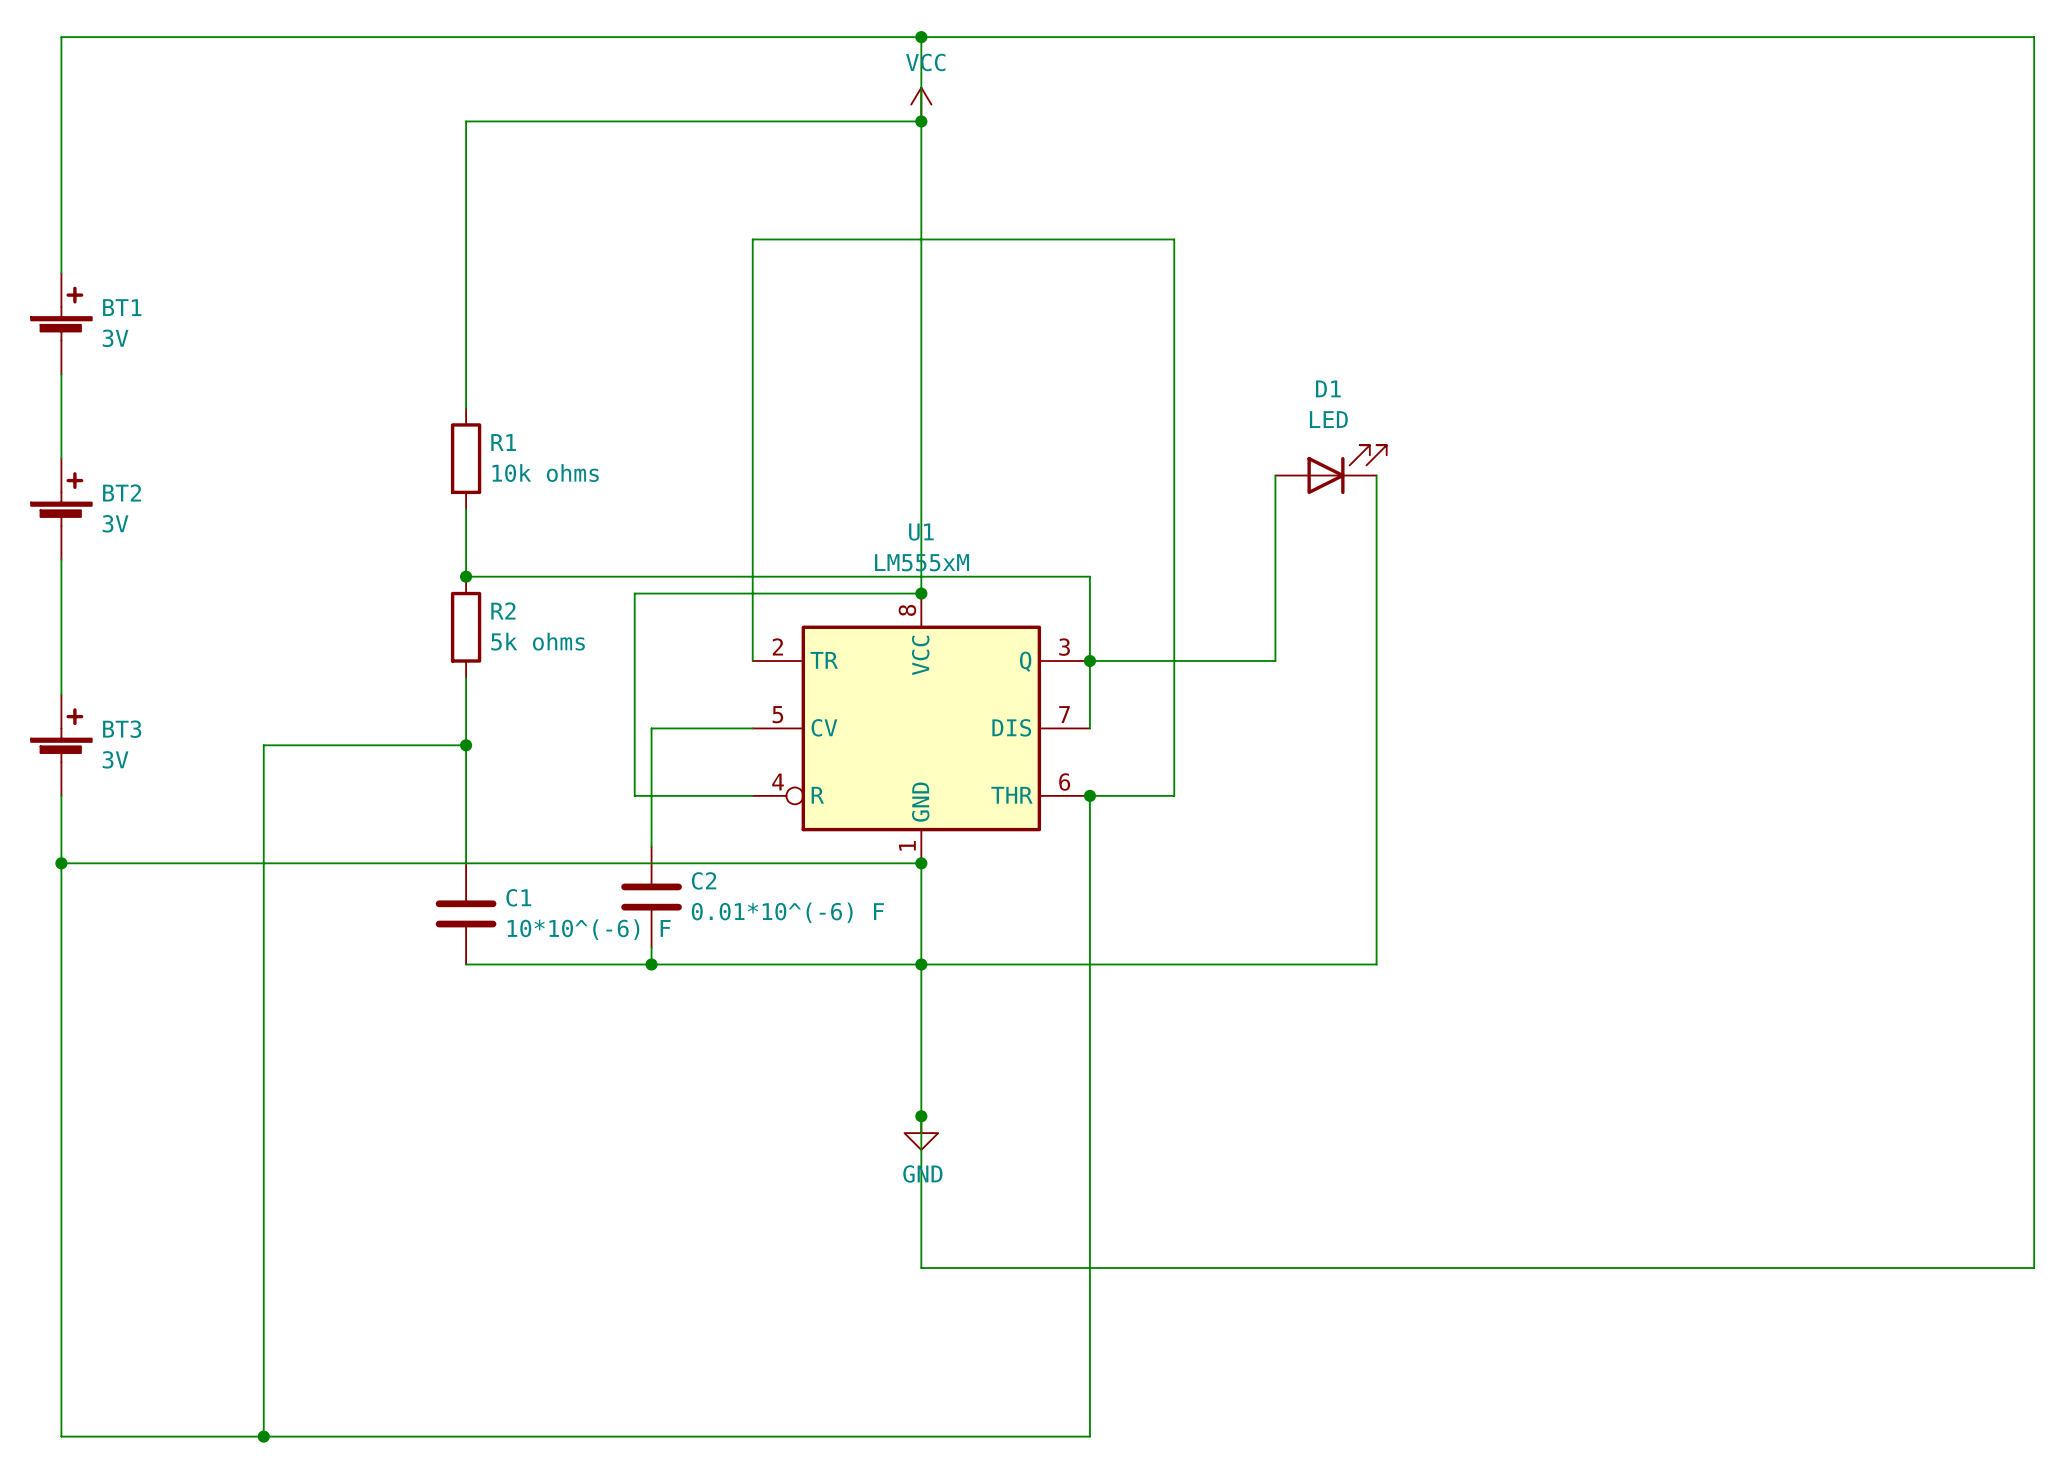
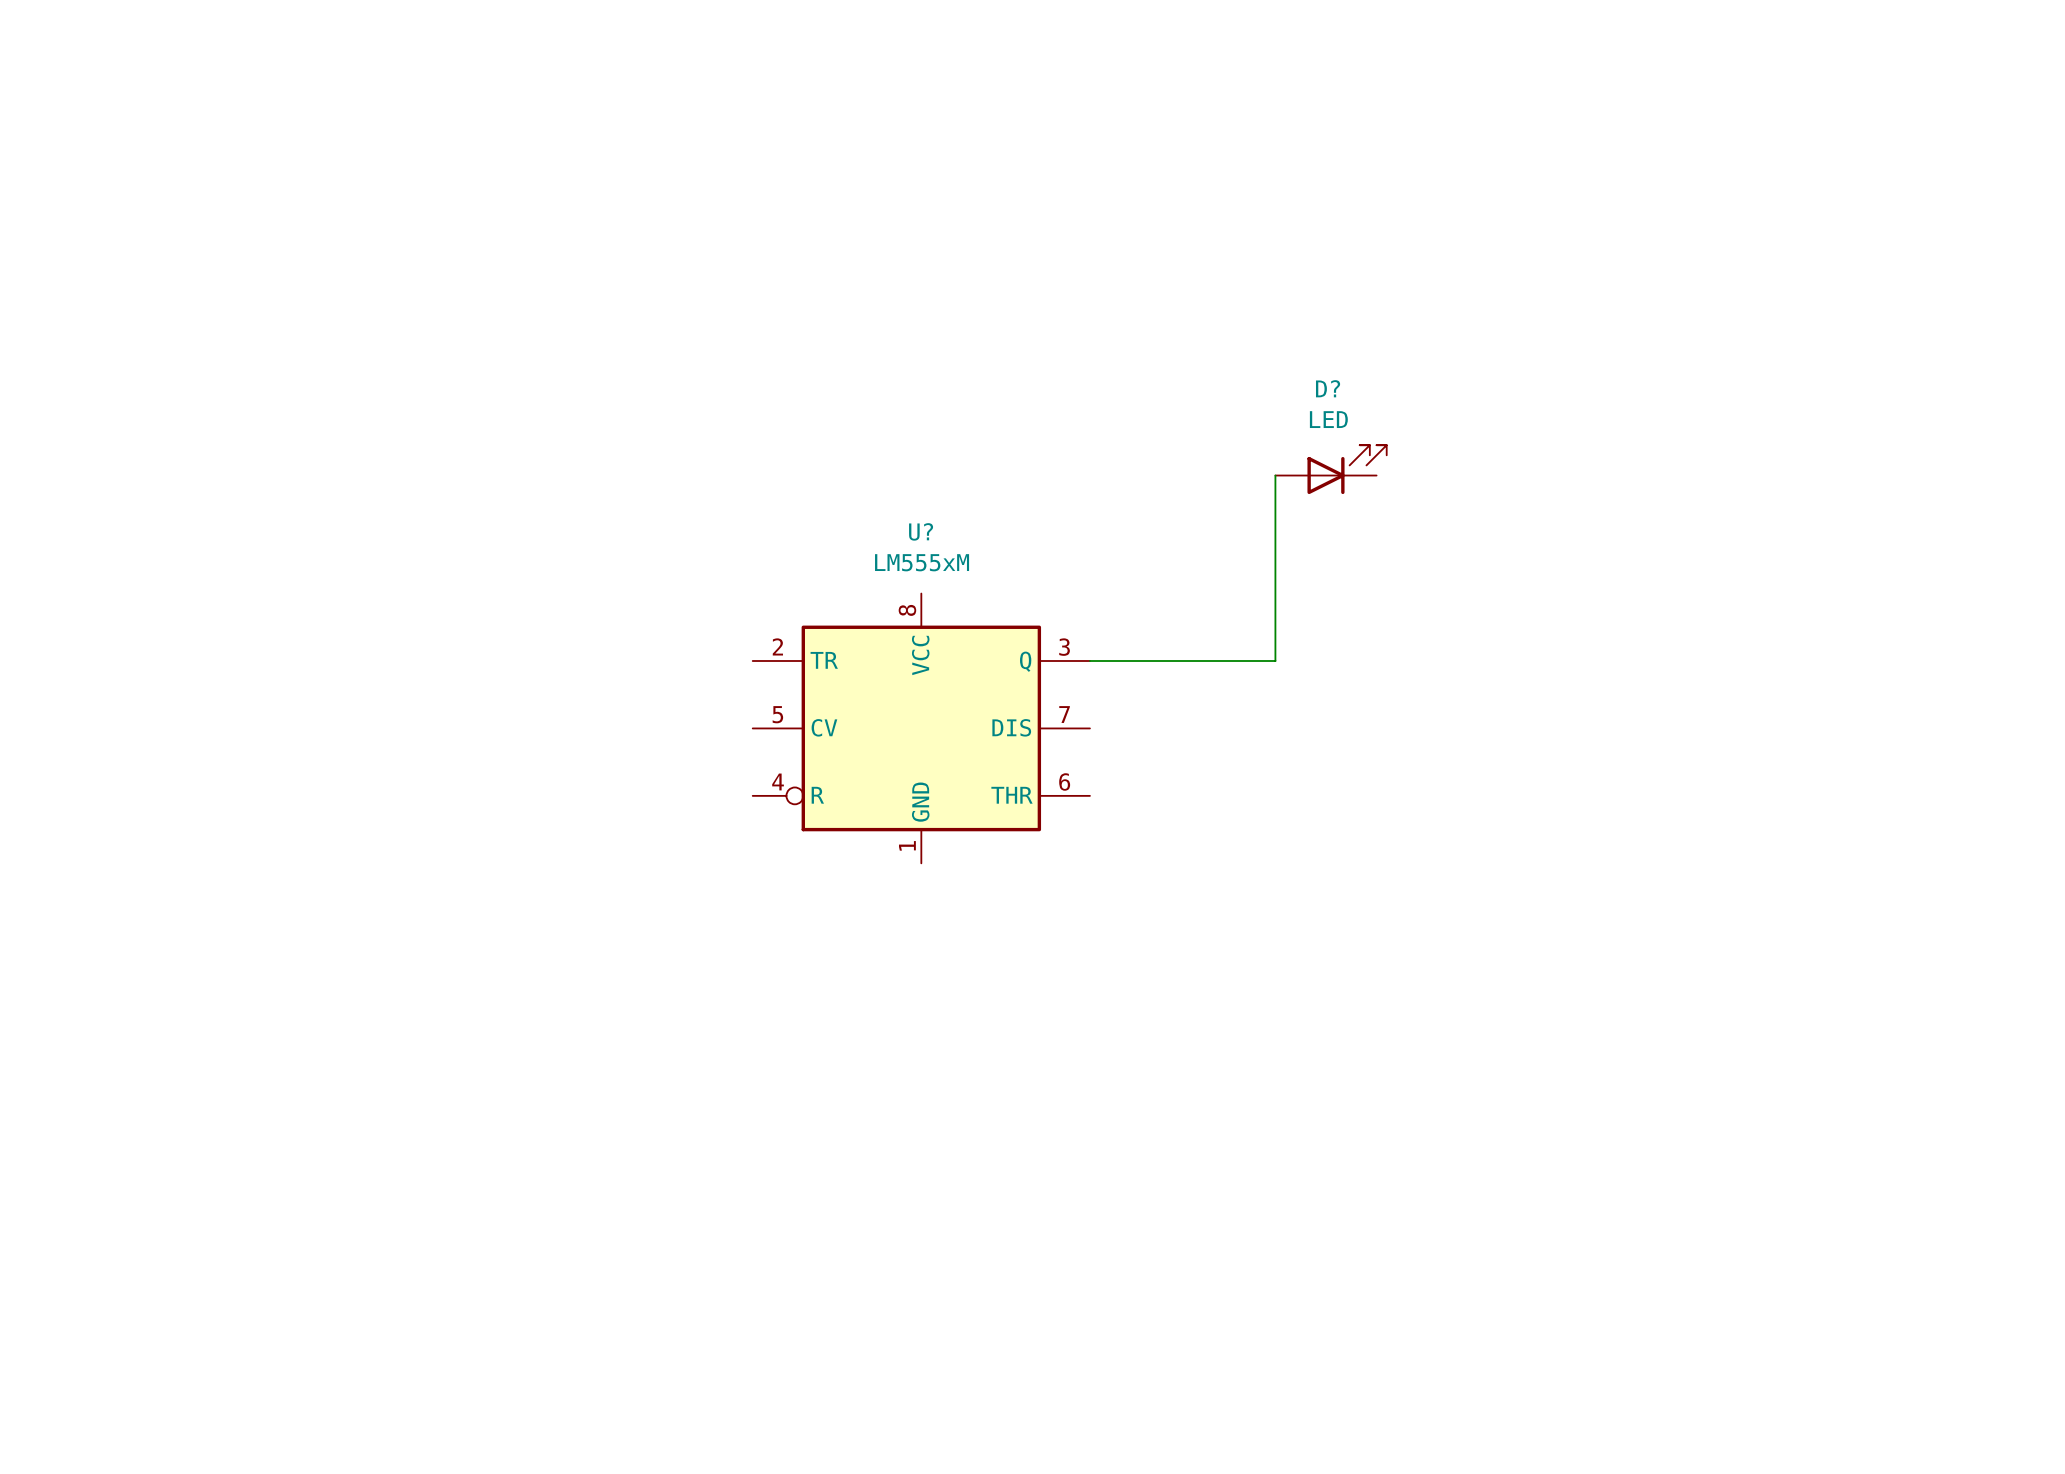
wire: (921, 37) (921, 593) (634, 593) (634, 795) (752, 795) -> none
junction: (921, 37) -> none
power symbol: VCC (921, 104) -> none
wire: (921, 121) (466, 121) (466, 408) -> none
junction: (921, 121) -> none
wire: (61, 273) (61, 37) (2034, 37) (2034, 1268) (921, 1268) (921, 863) (61, 863) -> none
BT1: 3V (61, 323) -> none
wire: (61, 374) (61, 458) -> none
D1 name: D1 (1328, 388) -> D? (1328, 388)
R1: 10k ohms (466, 458) -> none
wire: (1376, 475) (1376, 964) (466, 964) -> none
BT2: 3V (61, 509) -> none
wire: (466, 509) (466, 576) (1089, 576) (1089, 728) -> none
U1 name: U1 (921, 532) -> U? (921, 531)
wire: (61, 559) (61, 694) -> none
junction: (466, 576) -> none
junction: (921, 593) -> none
R2: 5k ohms (466, 627) -> none
wire: (752, 661) (752, 239) (1174, 239) (1174, 795) (1089, 795) (1089, 1436) (61, 1436) (61, 795) -> none
junction: (1089, 661) -> none
wire: (466, 677) (466, 863) -> none
wire: (752, 728) (651, 728) (651, 846) -> none
BT3: 3V (61, 745) -> none
wire: (466, 745) (263, 745) (263, 1436) -> none
junction: (466, 745) -> none
junction: (1089, 795) -> none
junction: (61, 863) -> none
junction: (921, 863) -> none
C2: 0.01*10^(-6) F (651, 897) -> none
C1: 10*10^(-6) F (466, 913) -> none
wire: (651, 947) (651, 964) -> none
junction: (651, 964) -> none
junction: (921, 964) -> none
junction: (921, 1116) -> none
power symbol: GND (921, 1133) -> none
junction: (263, 1436) -> none

